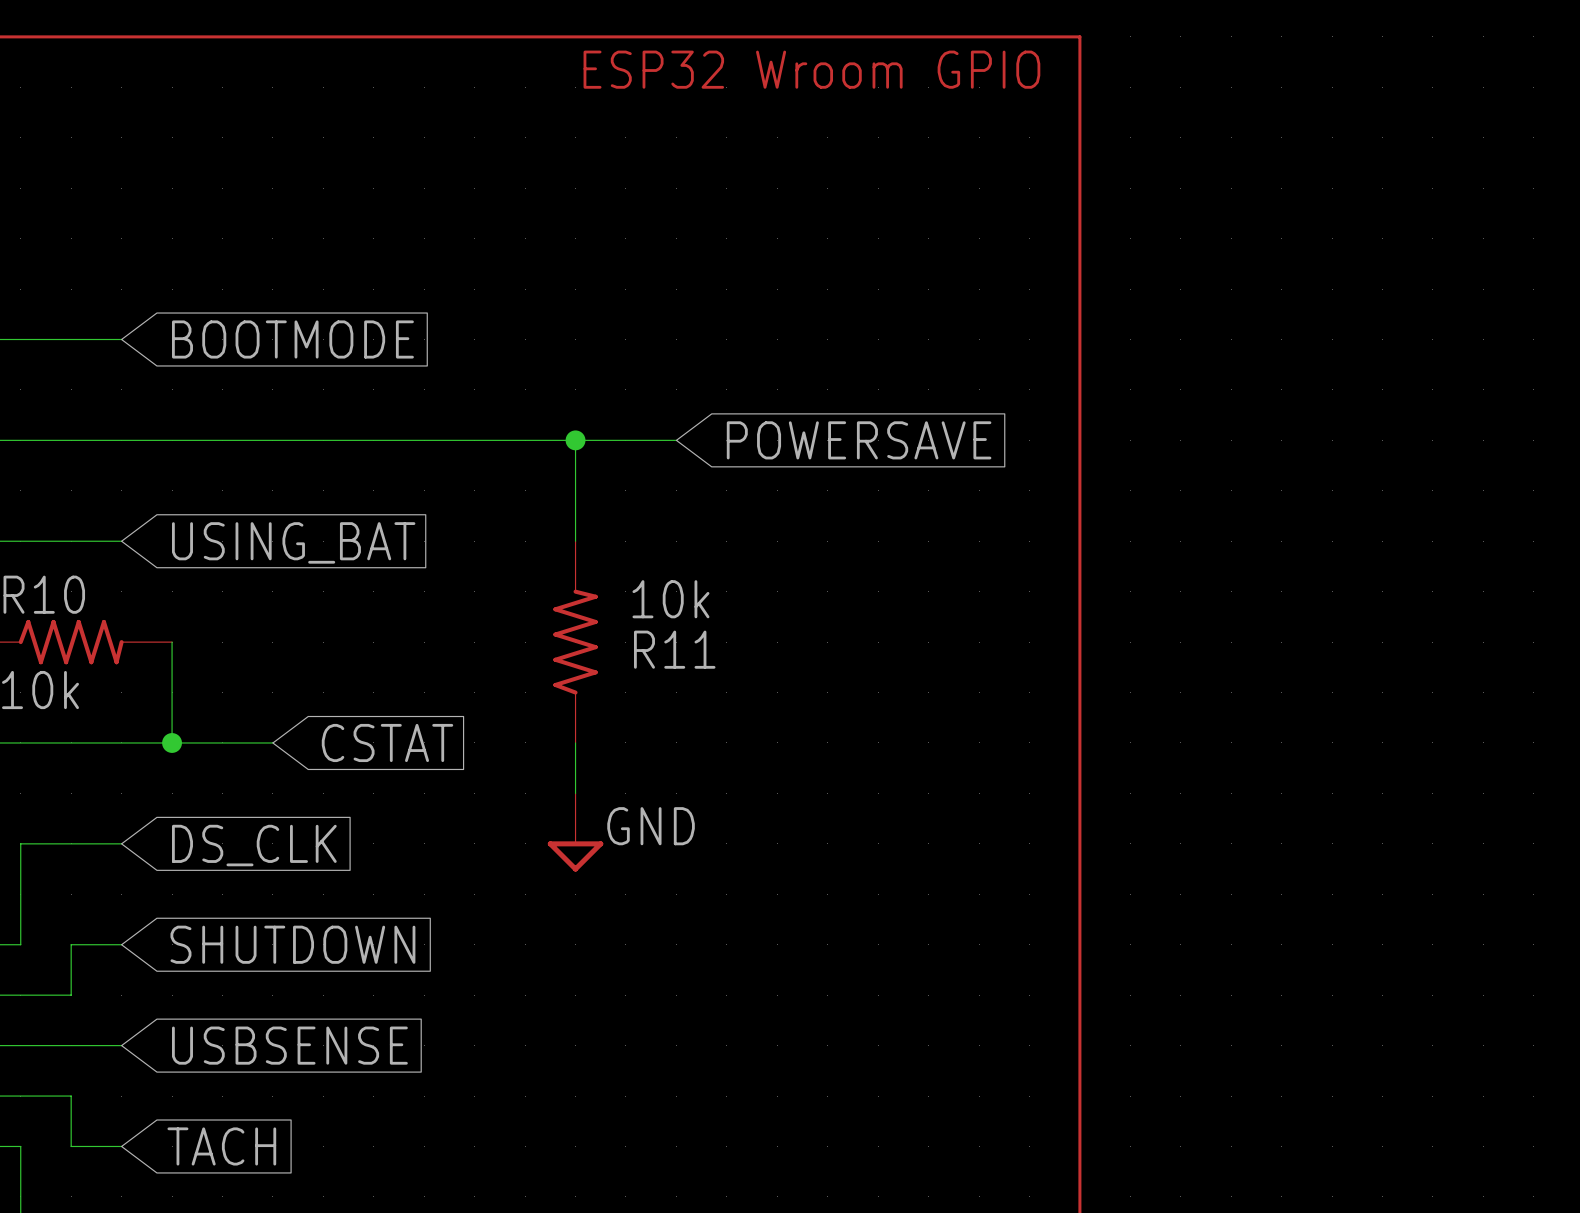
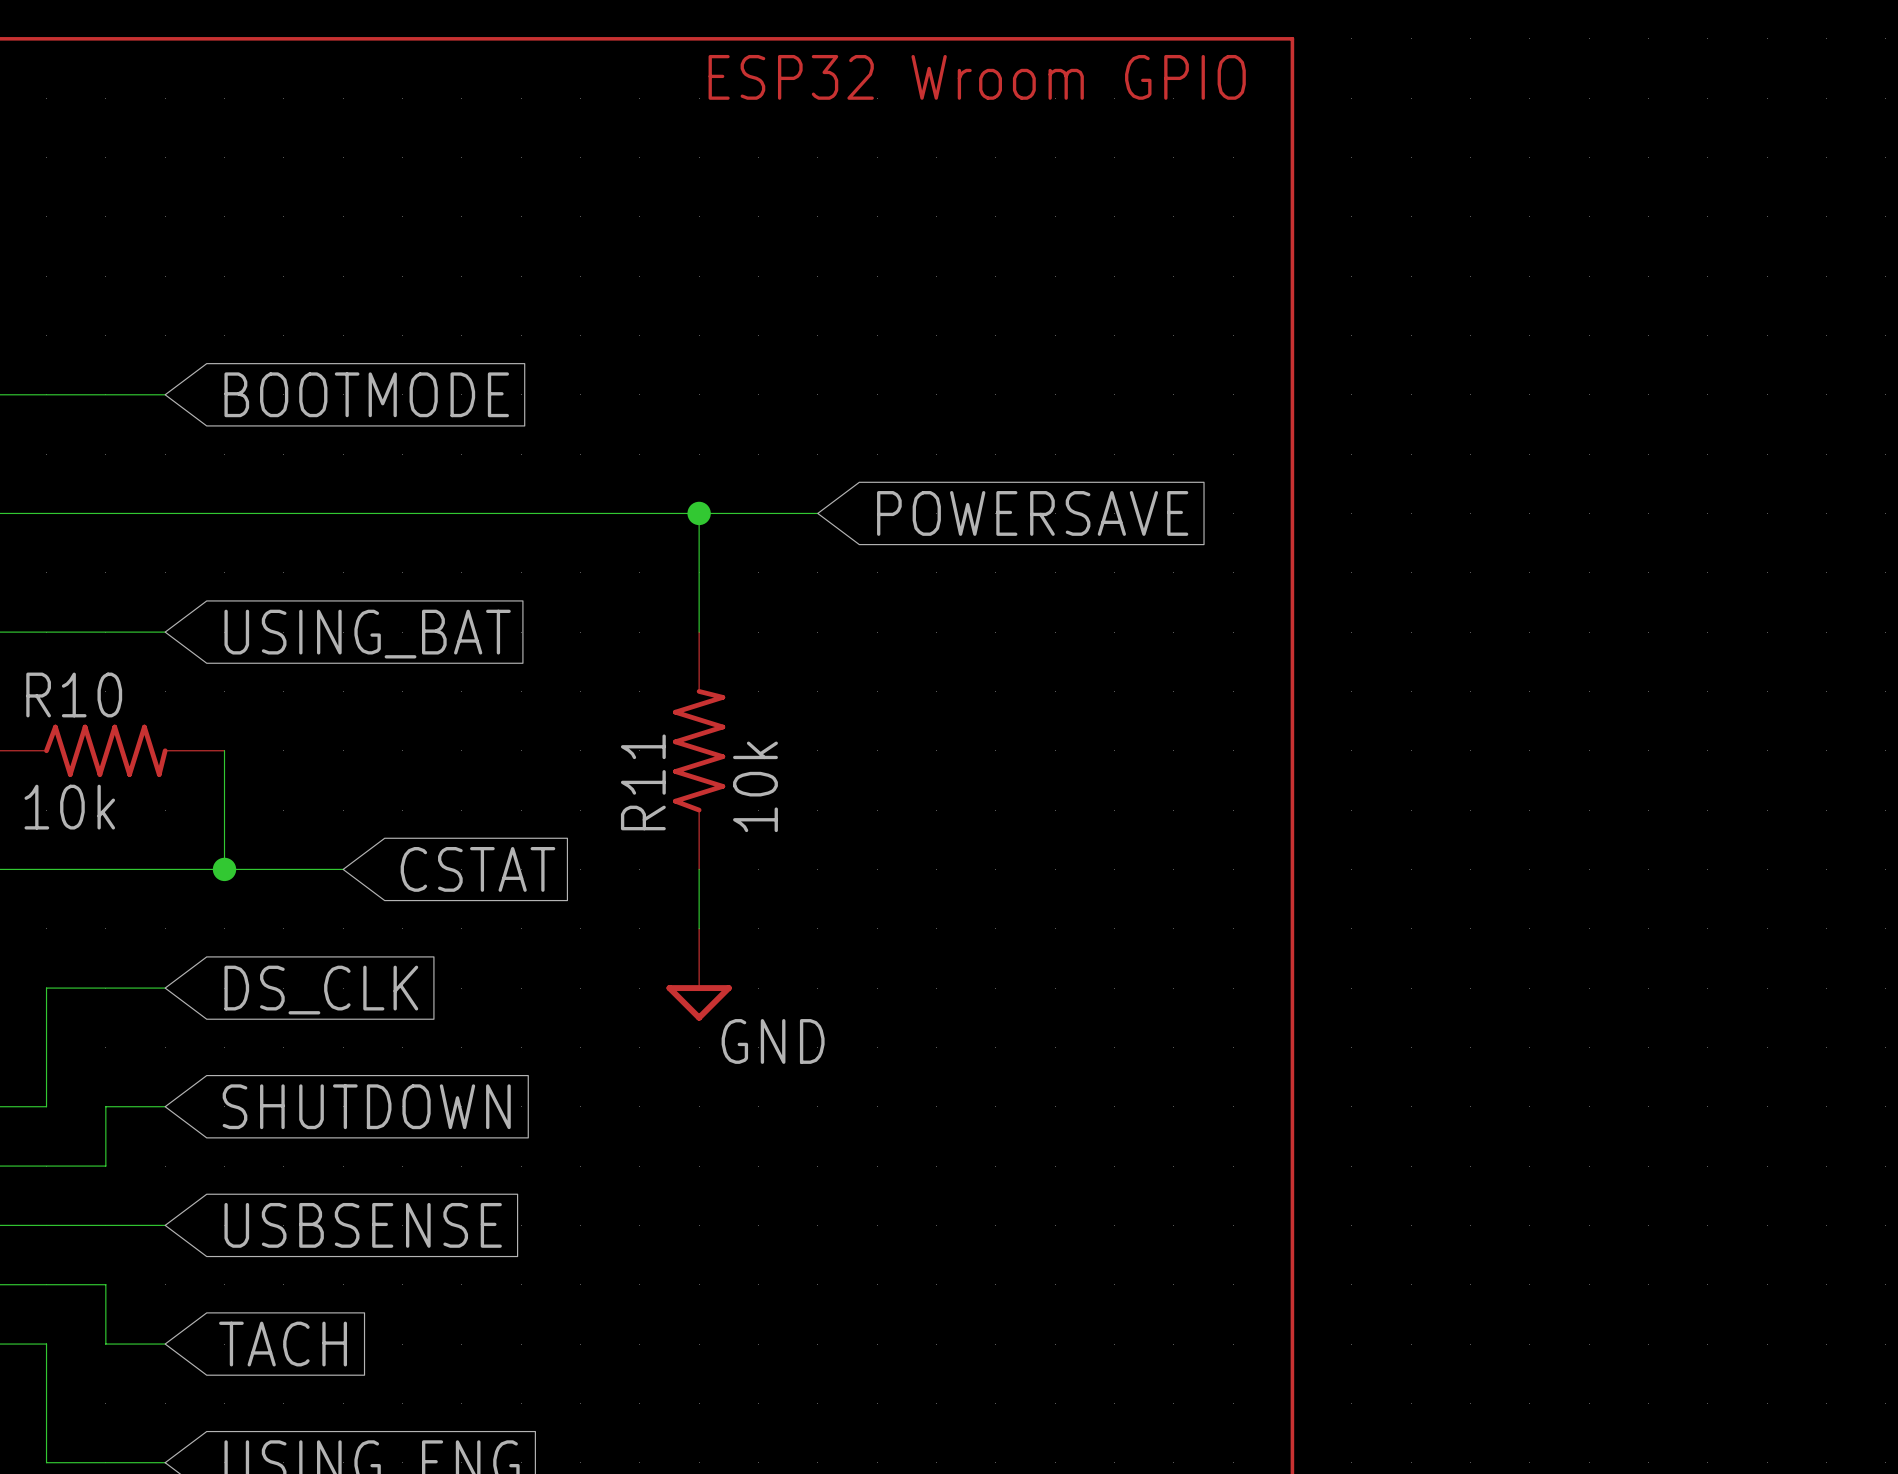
R11 value rotation: 0° (670, 599) -> 90° counterclockwise (755, 786)
R11 name rotation: 0° (674, 649) -> 90° counterclockwise (643, 782)
R11 name position: R11 (674, 649) -> R11 (643, 782)
power symbol text position: GND (651, 826) -> GND (773, 1041)

